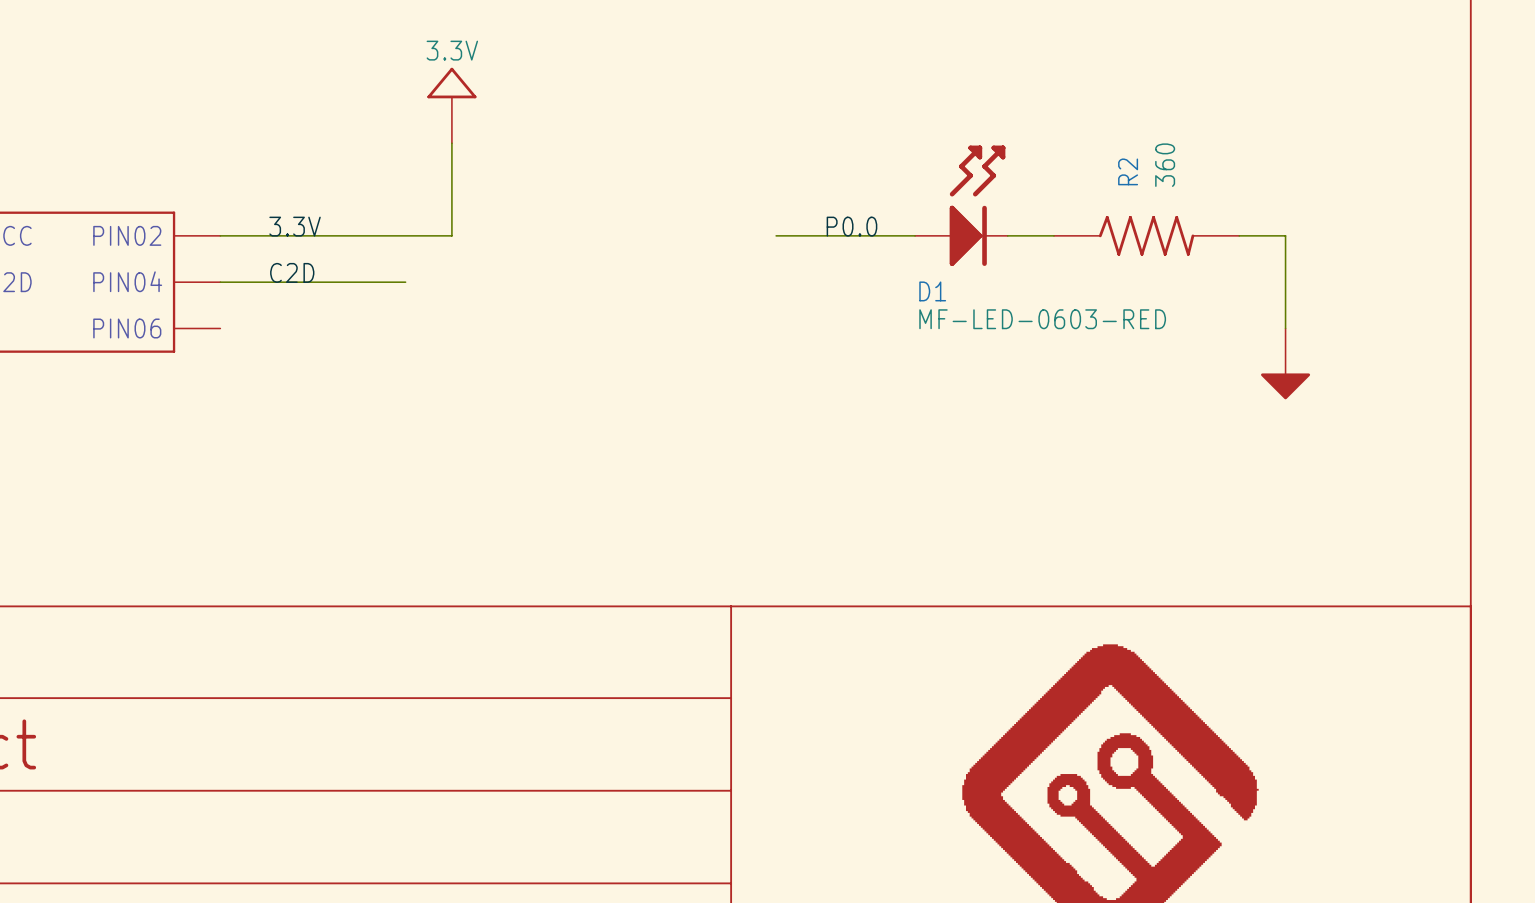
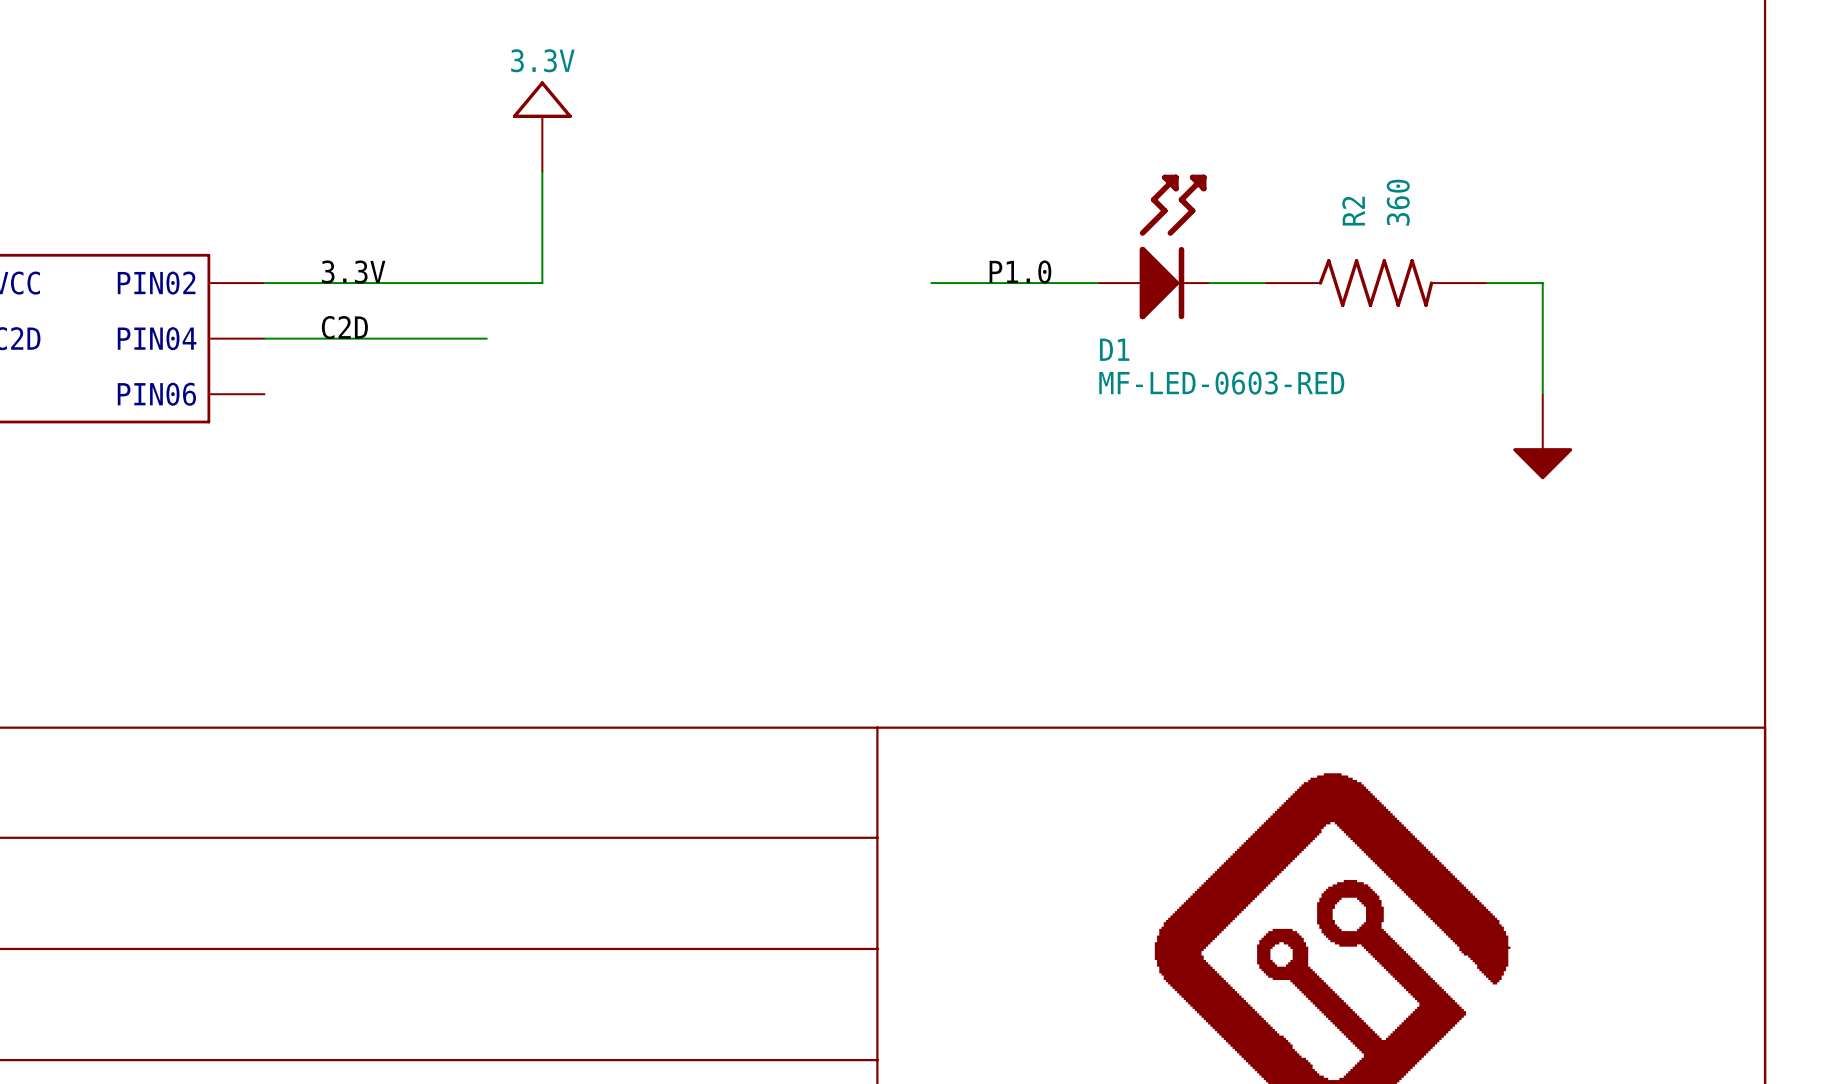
label: P0.0 (851, 226) -> P1.0 (1020, 271)

